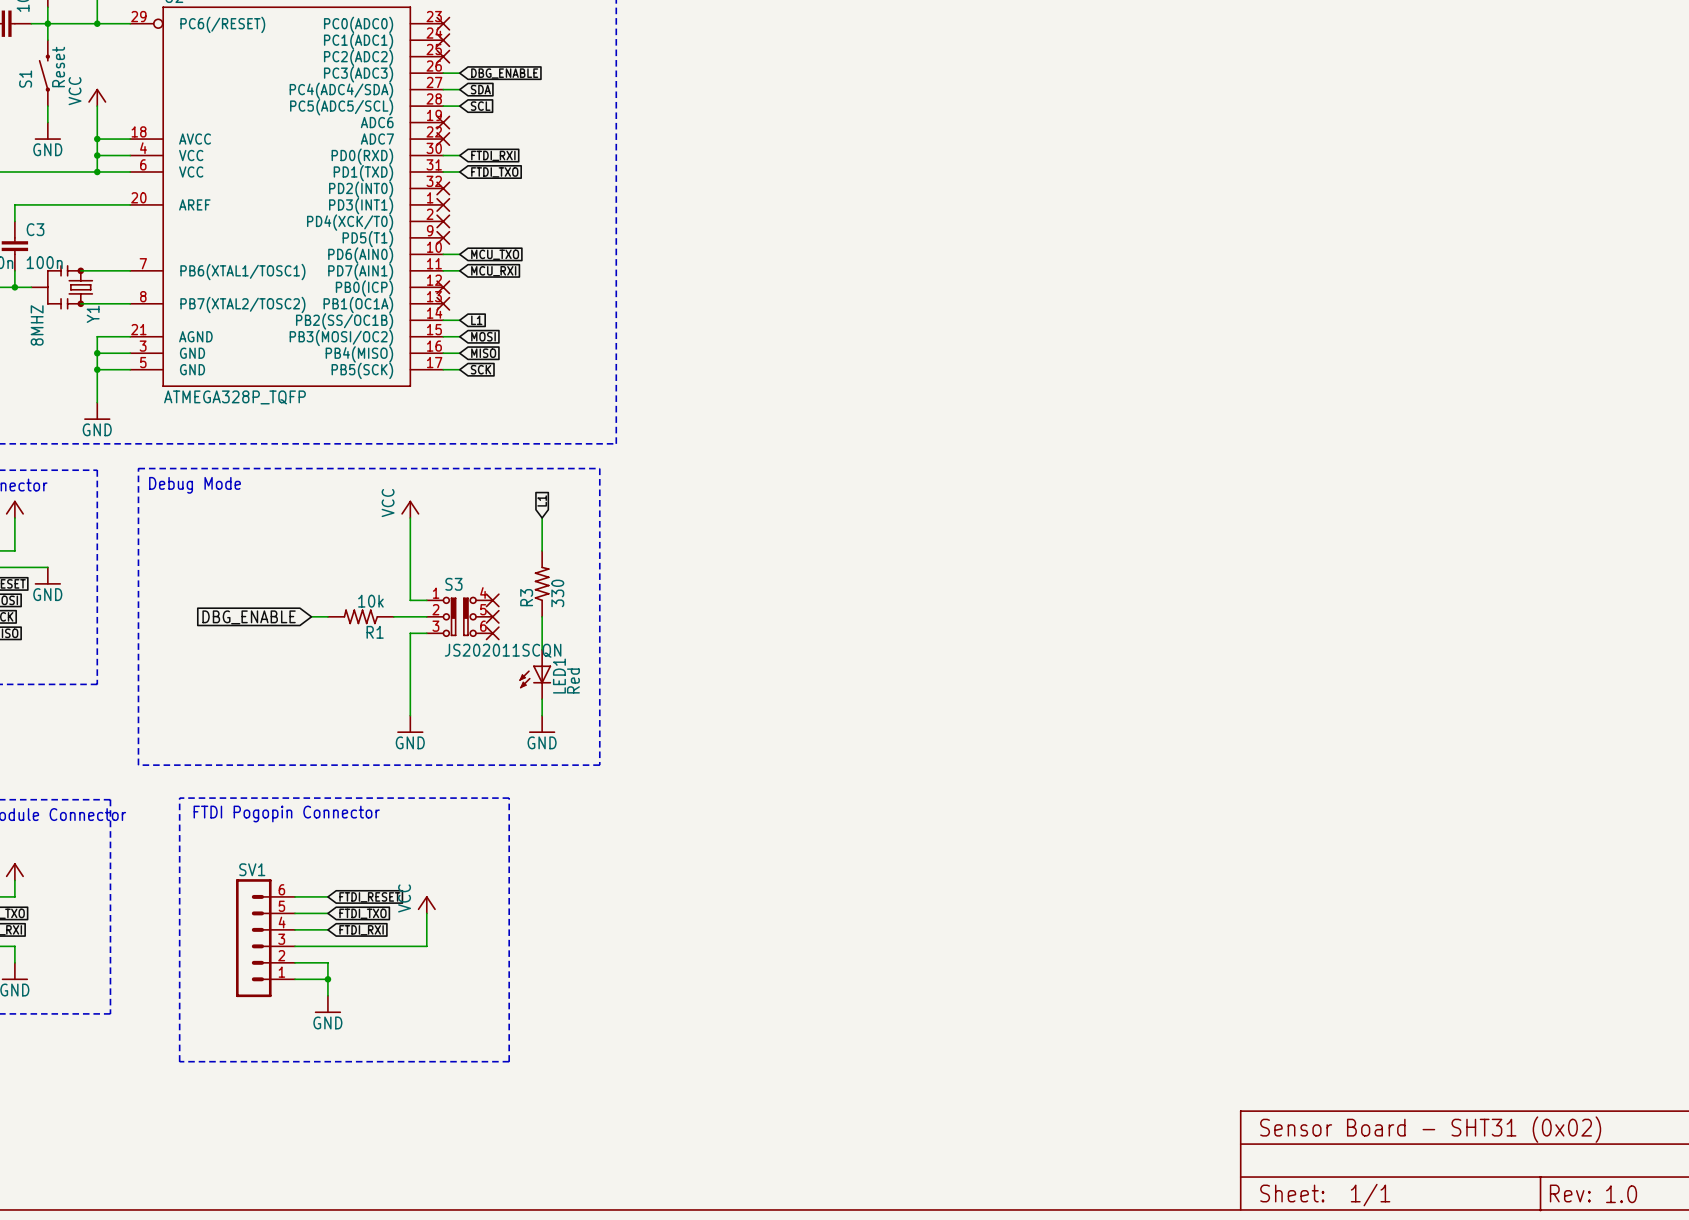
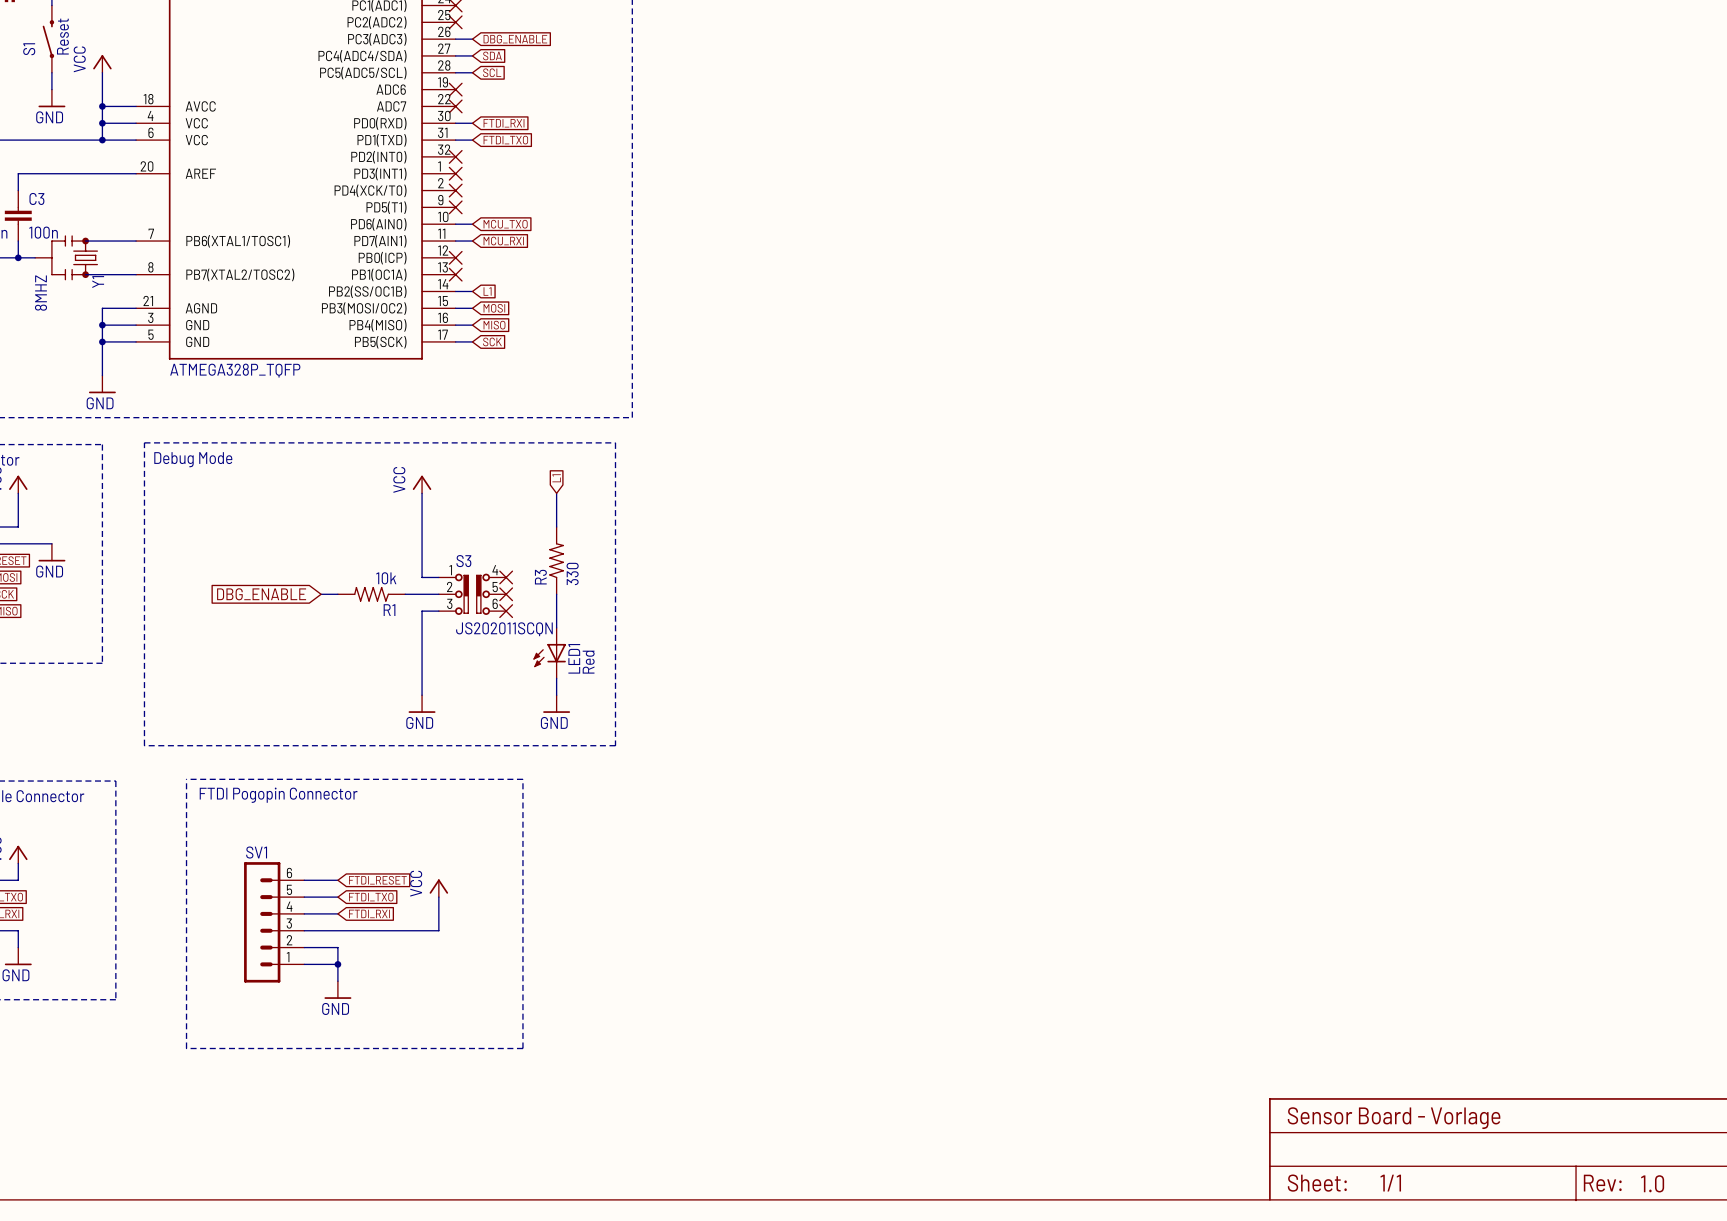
text: Sensor Board - SHT31 (0x02) (1430, 1129) -> Sensor Board - Vorlage (1394, 1118)

